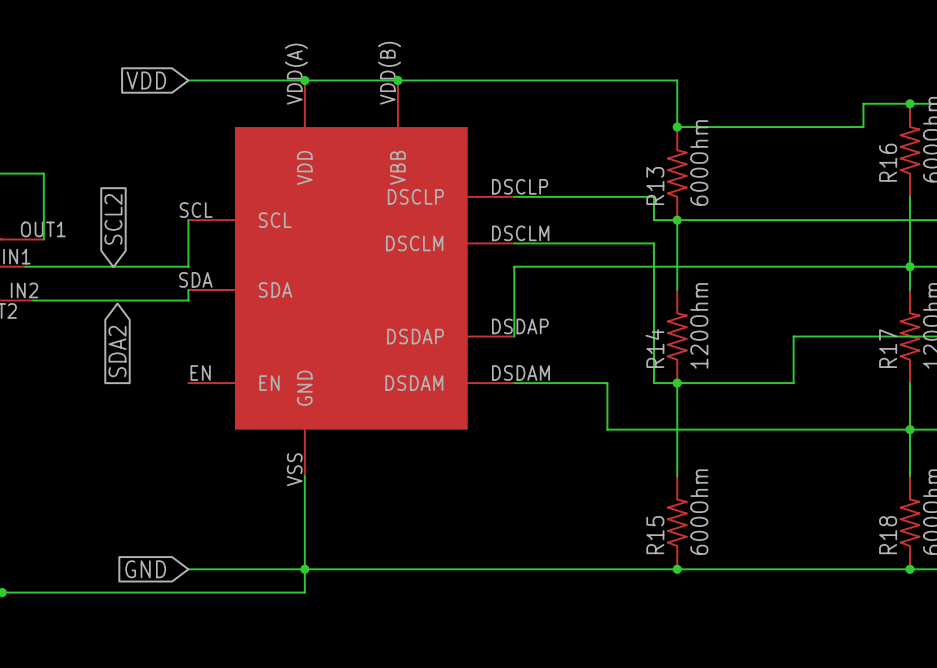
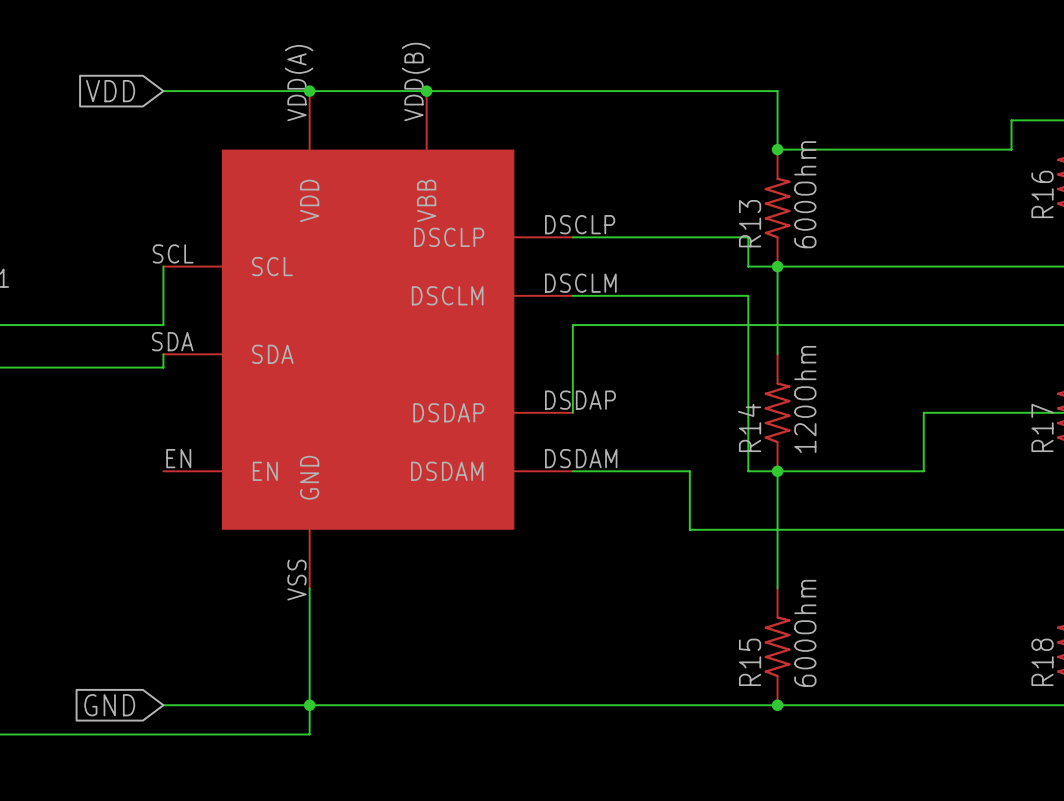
global label: SCL2 (113, 219) -> none
global label: SDA2 (117, 351) -> none

